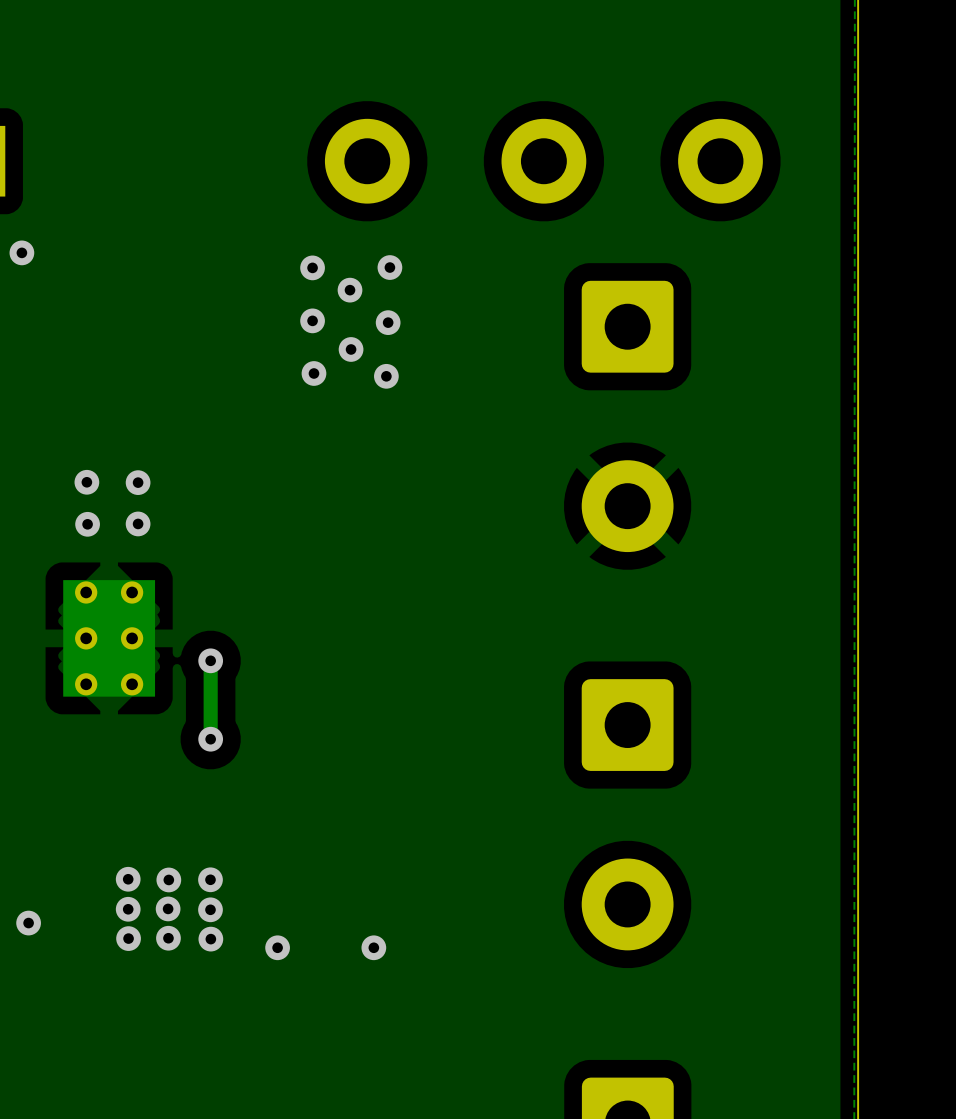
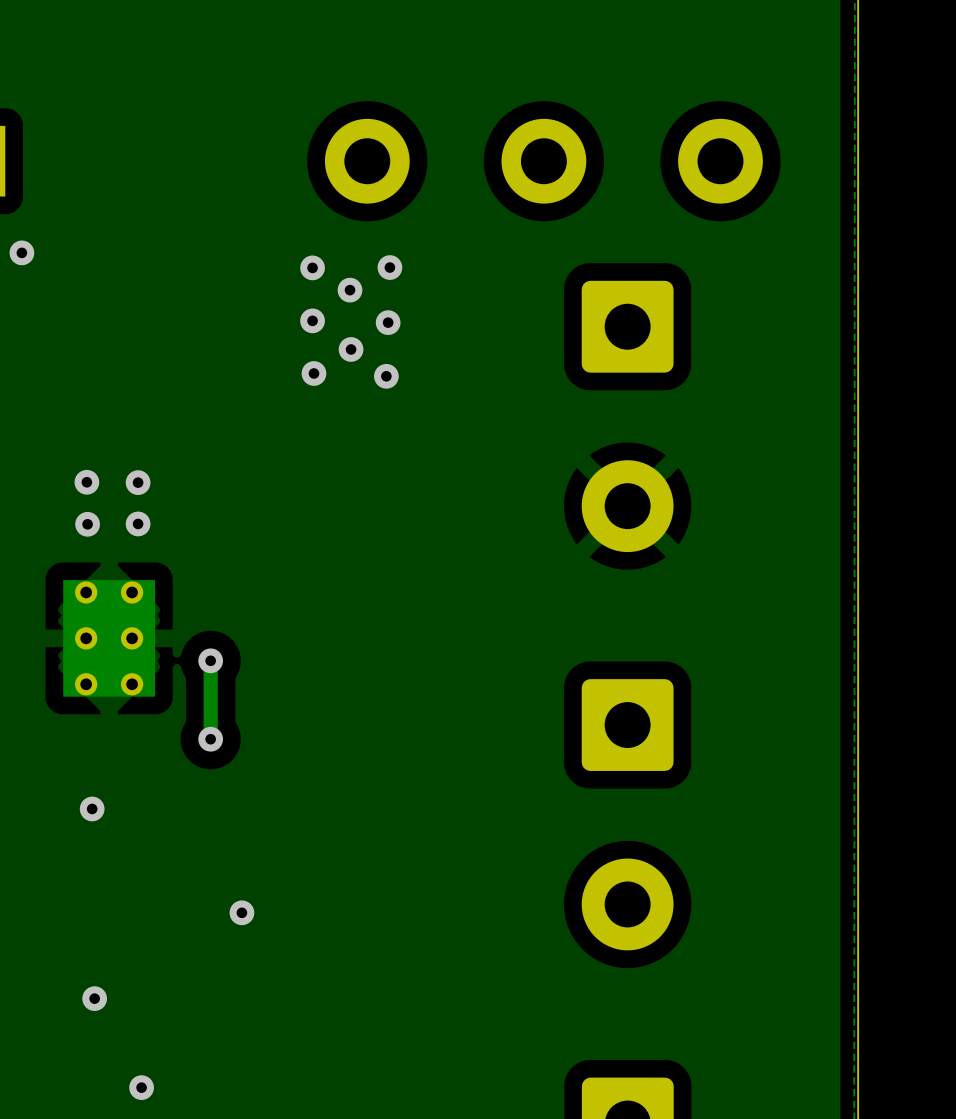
via: none -> (92, 808)
via: (128, 879) -> none
via: (168, 879) -> none
via: (210, 879) -> none
via: (168, 908) -> none
via: (128, 909) -> none
via: (210, 909) -> none
via: none -> (241, 912)
via: (28, 923) -> none
via: (128, 938) -> none
via: (168, 938) -> none
via: (210, 939) -> none
via: (277, 947) -> none
via: (373, 947) -> none
via: none -> (94, 998)
via: none -> (141, 1087)

